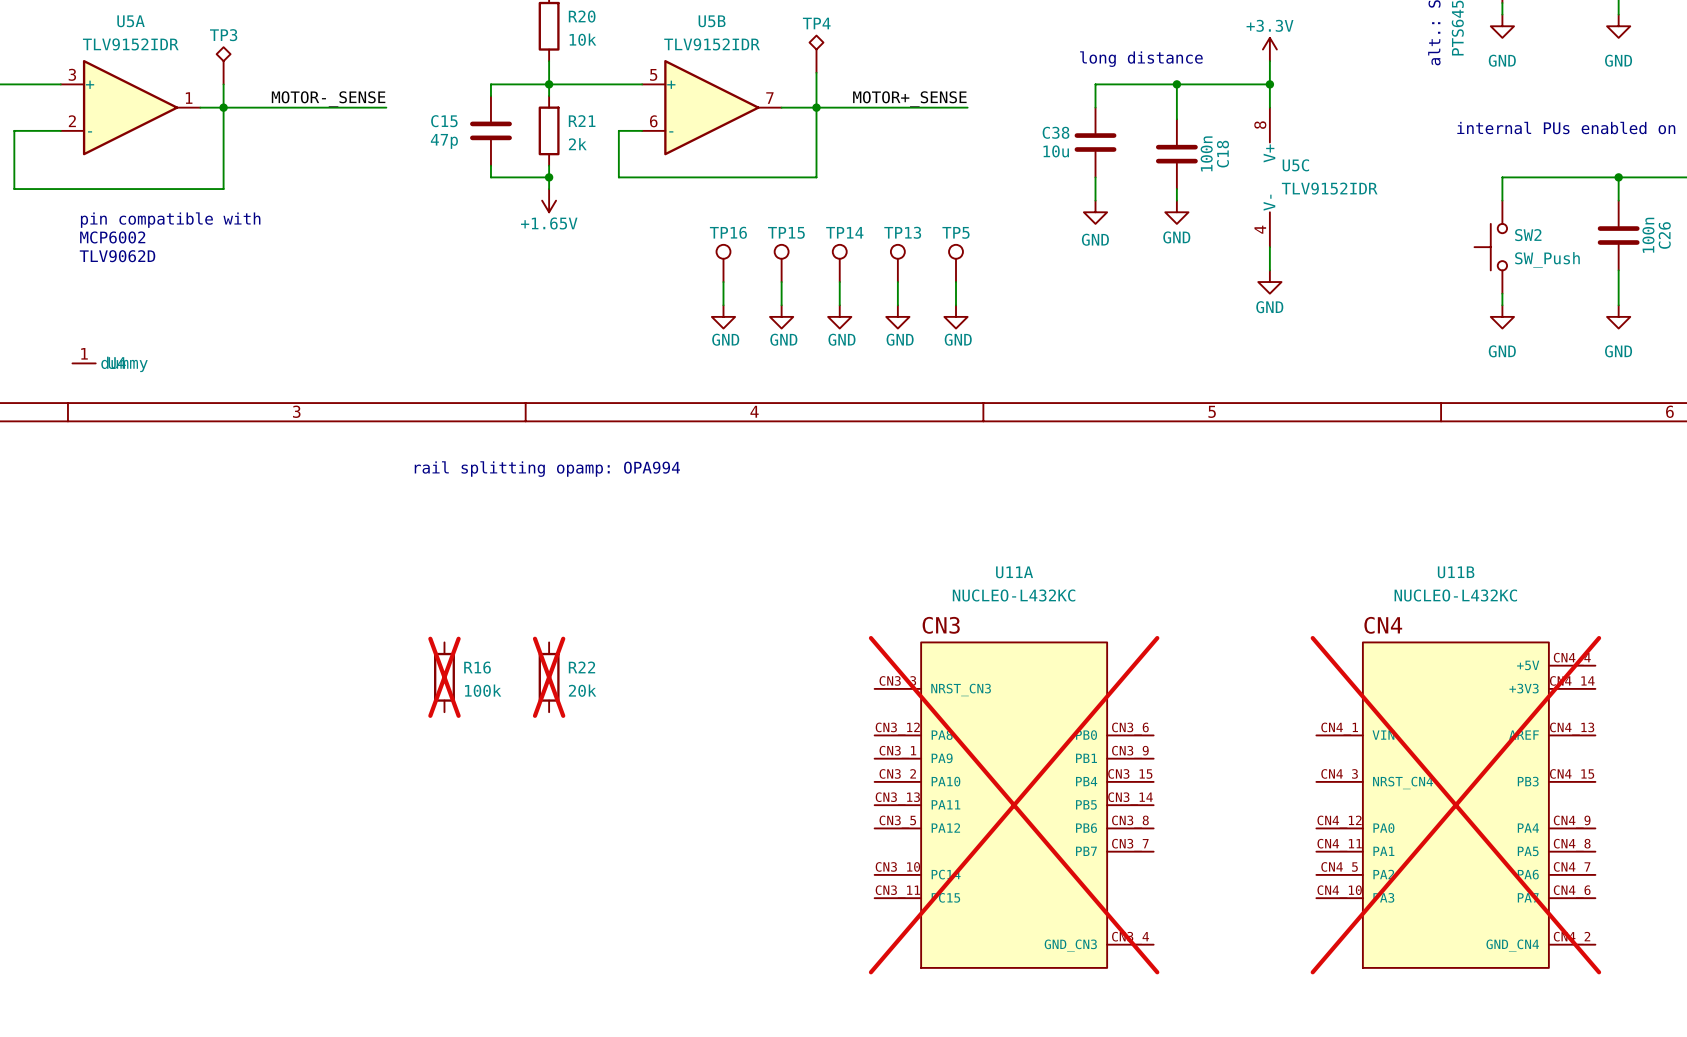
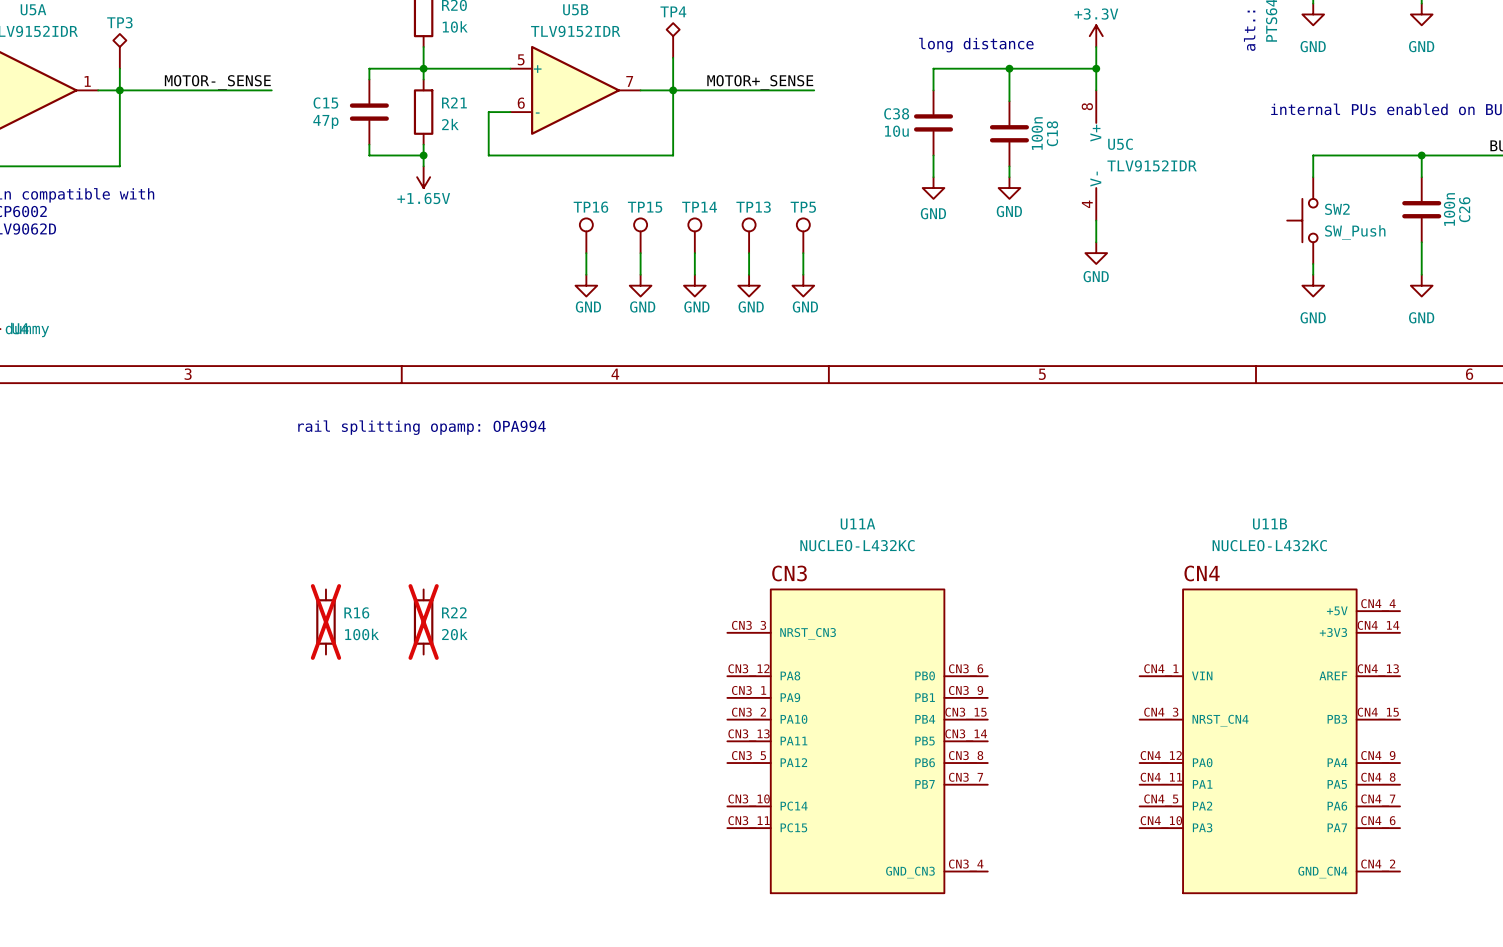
U11A do-not-place cross: (1014, 805) -> none
U11B do-not-place cross: (1455, 805) -> none

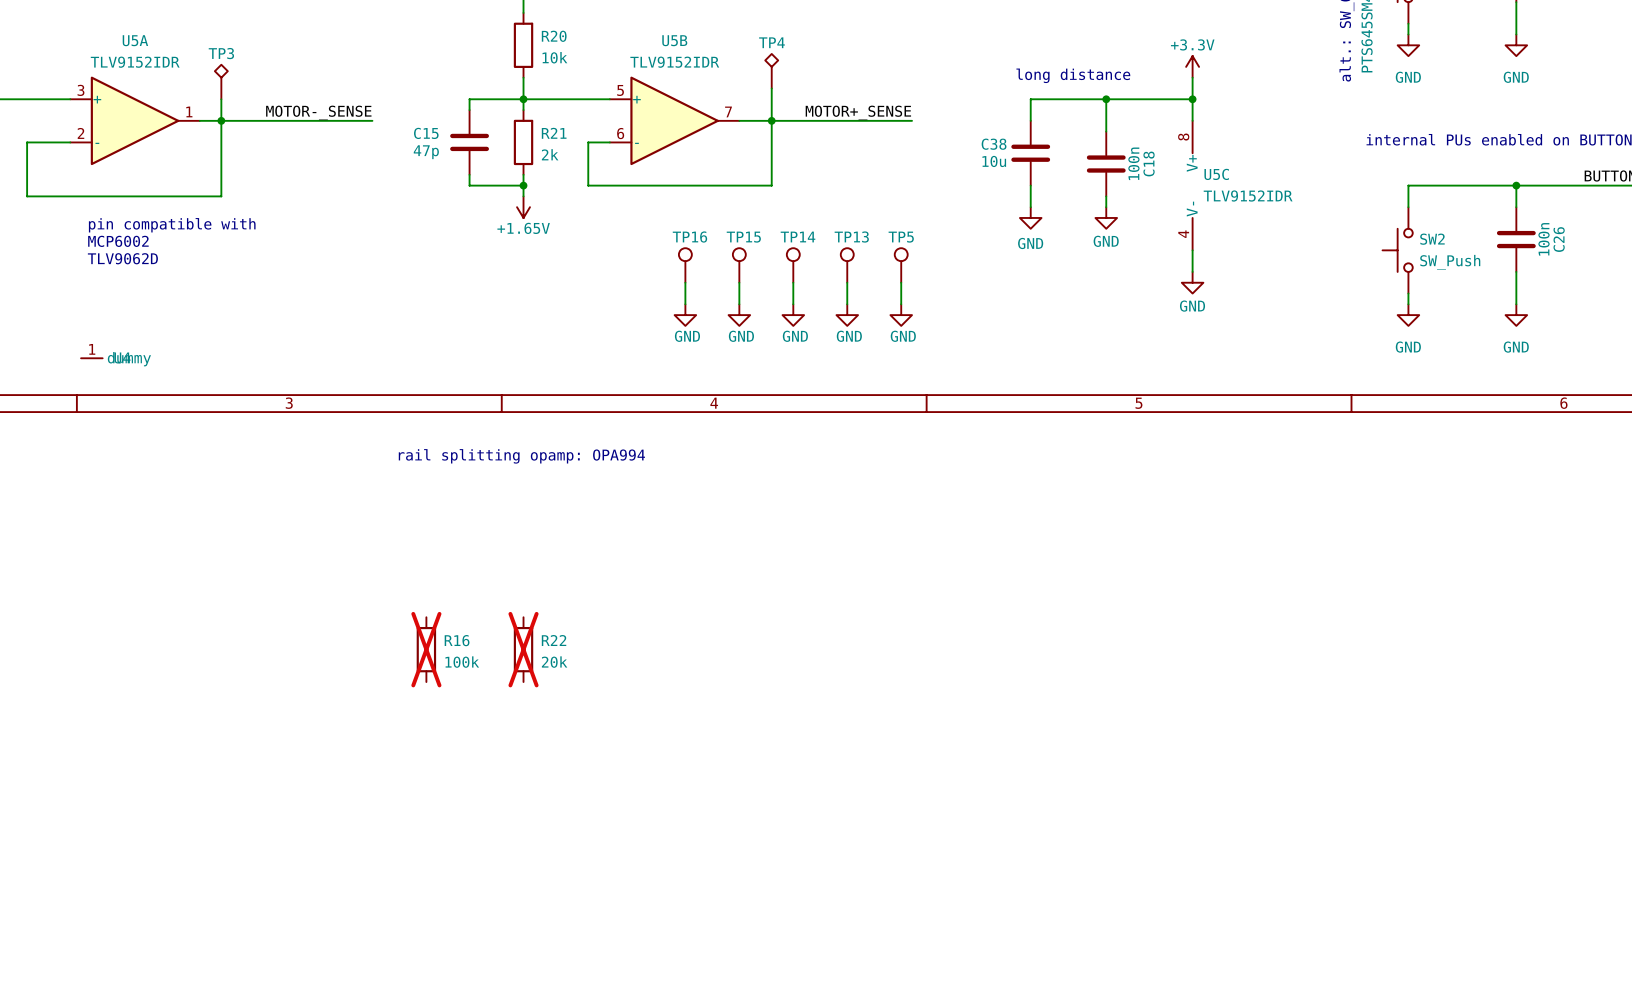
U11A: NUCLEO-L432KC (857, 741) -> none
U11B: NUCLEO-L432KC (1269, 741) -> none

